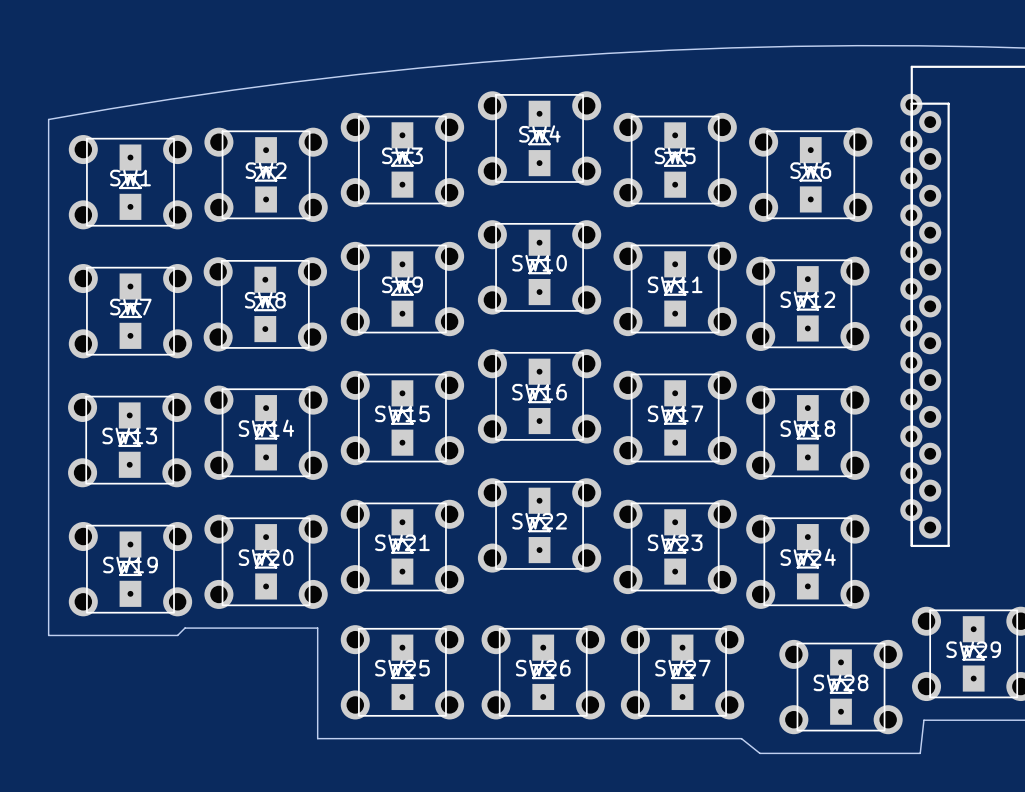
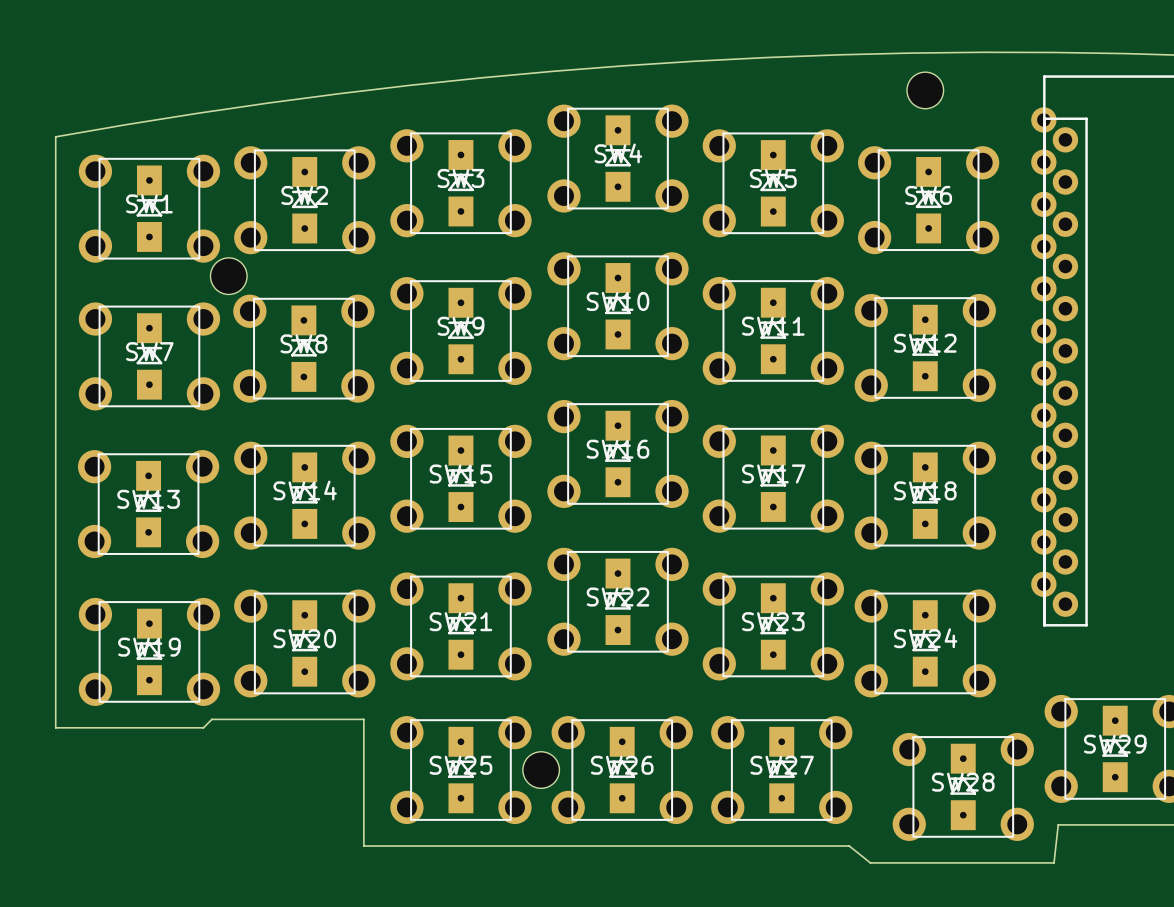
part: none -> (925, 90)
part: none -> (228, 276)
part: none -> (541, 770)

